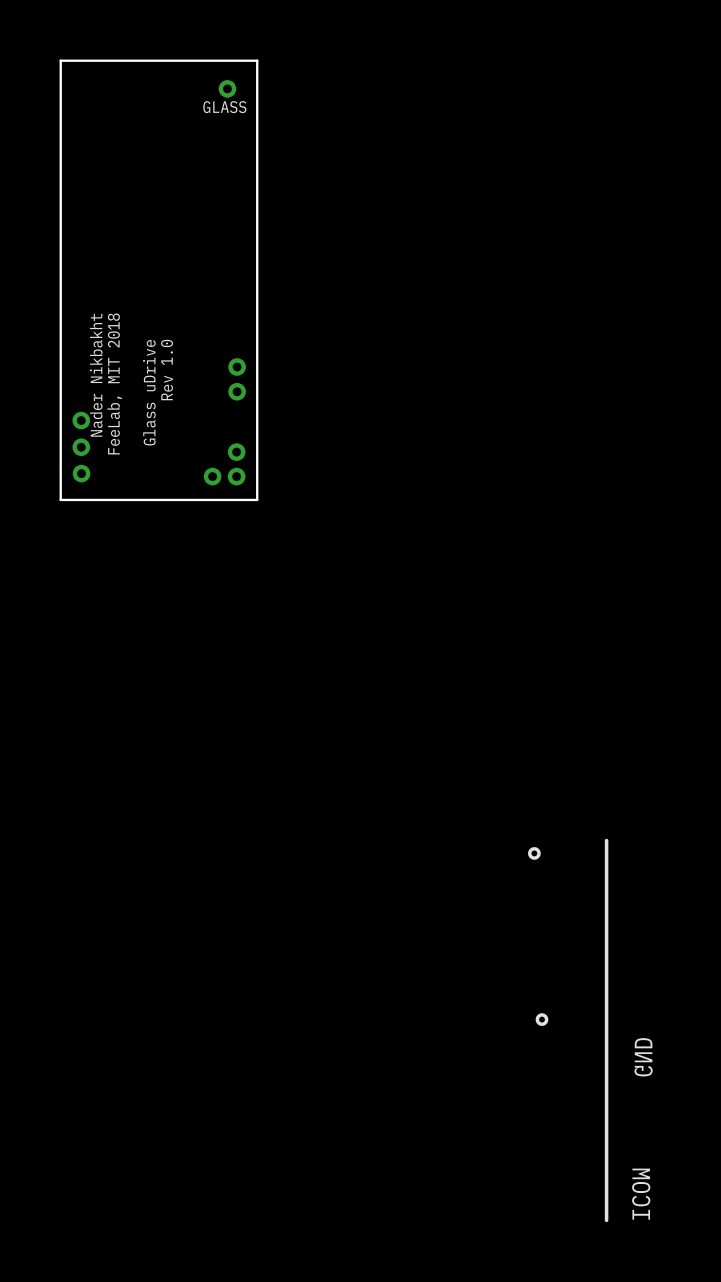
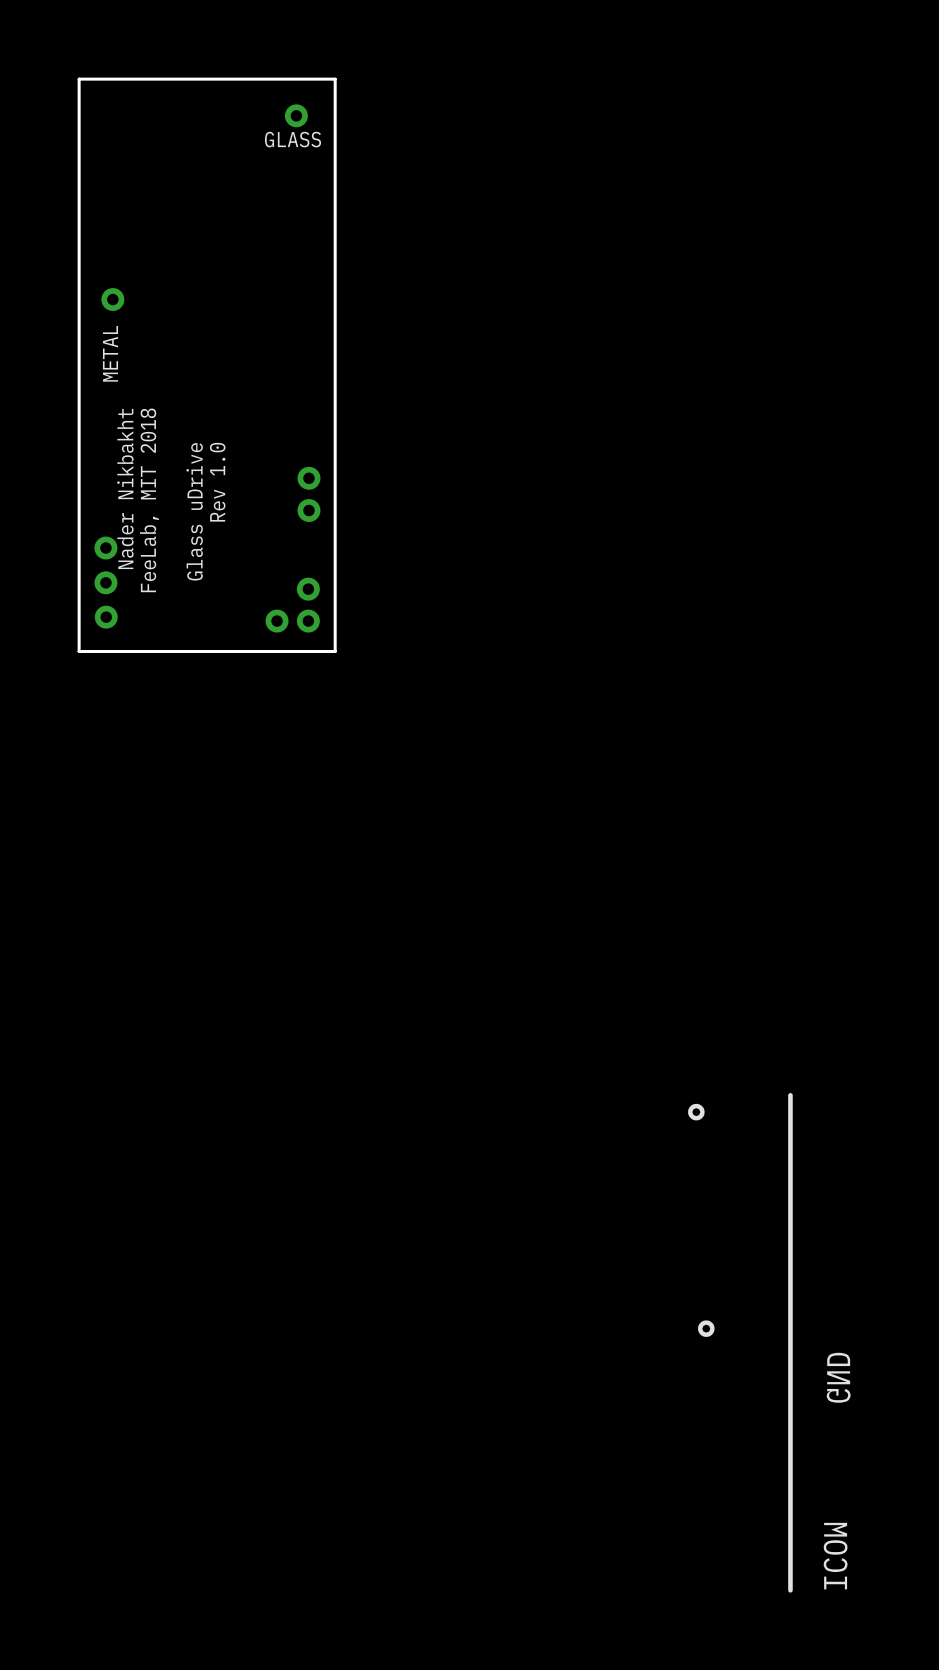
METAL: none -> (112, 299)

